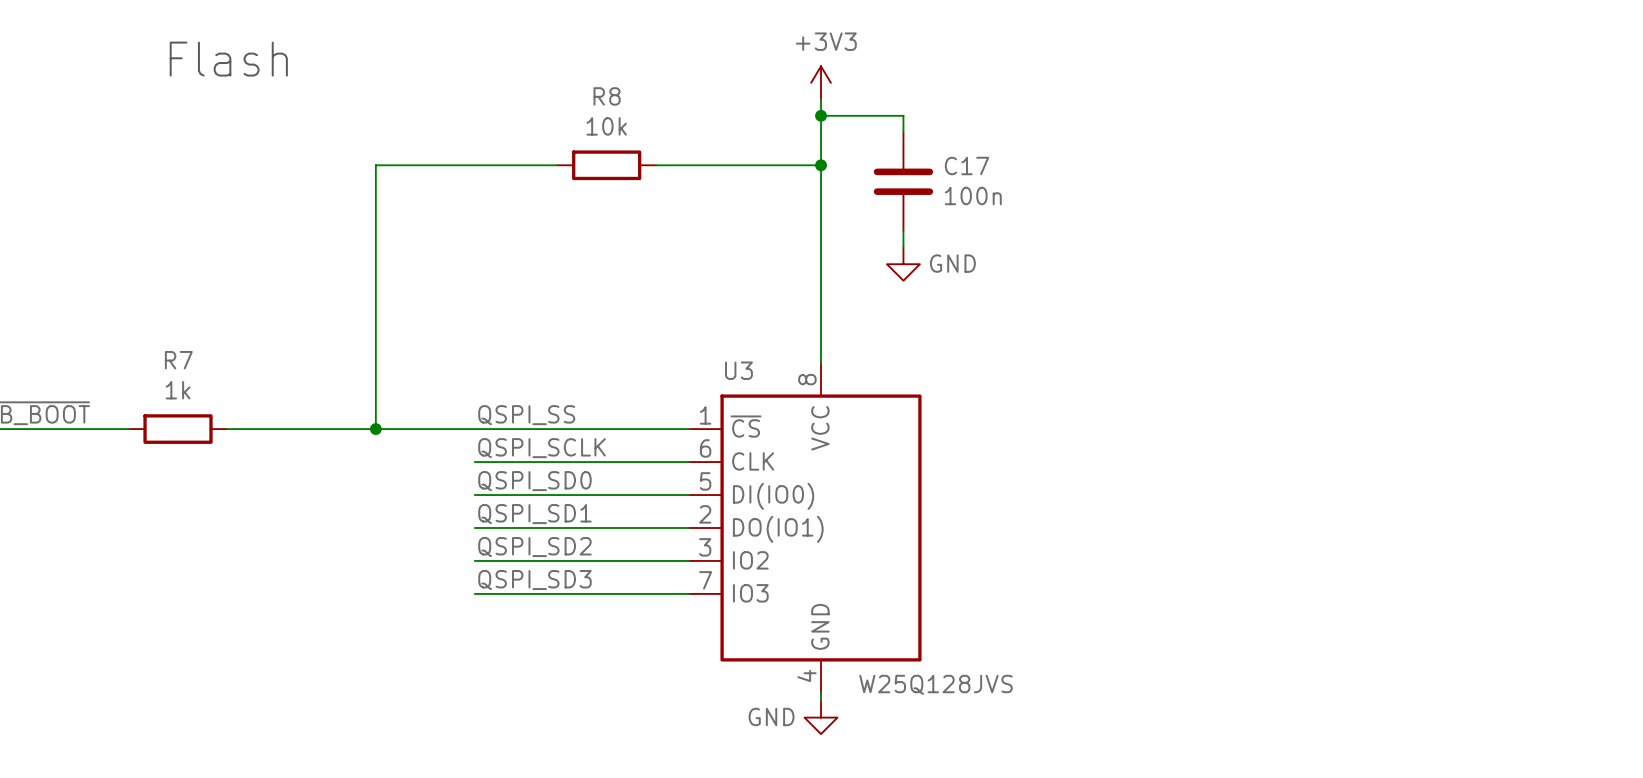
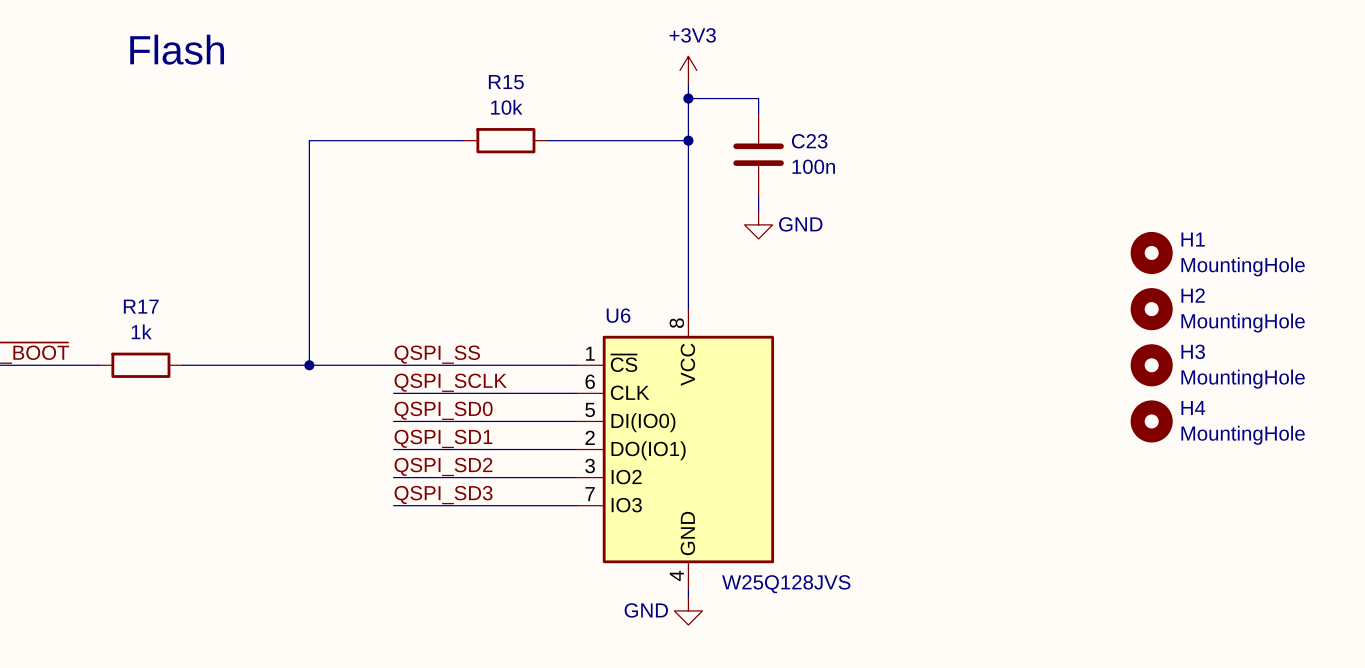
R8 name: R8 (607, 96) -> R15 (506, 82)
C17 name: C17 (967, 165) -> C23 (809, 141)
H1: none -> MountingHole (1151, 252)
R7 name: R7 (178, 360) -> R17 (141, 306)
H2: none -> MountingHole (1151, 309)
U3 name: U3 (738, 370) -> U6 (618, 315)
H3: none -> MountingHole (1151, 365)
H4: none -> MountingHole (1151, 421)

